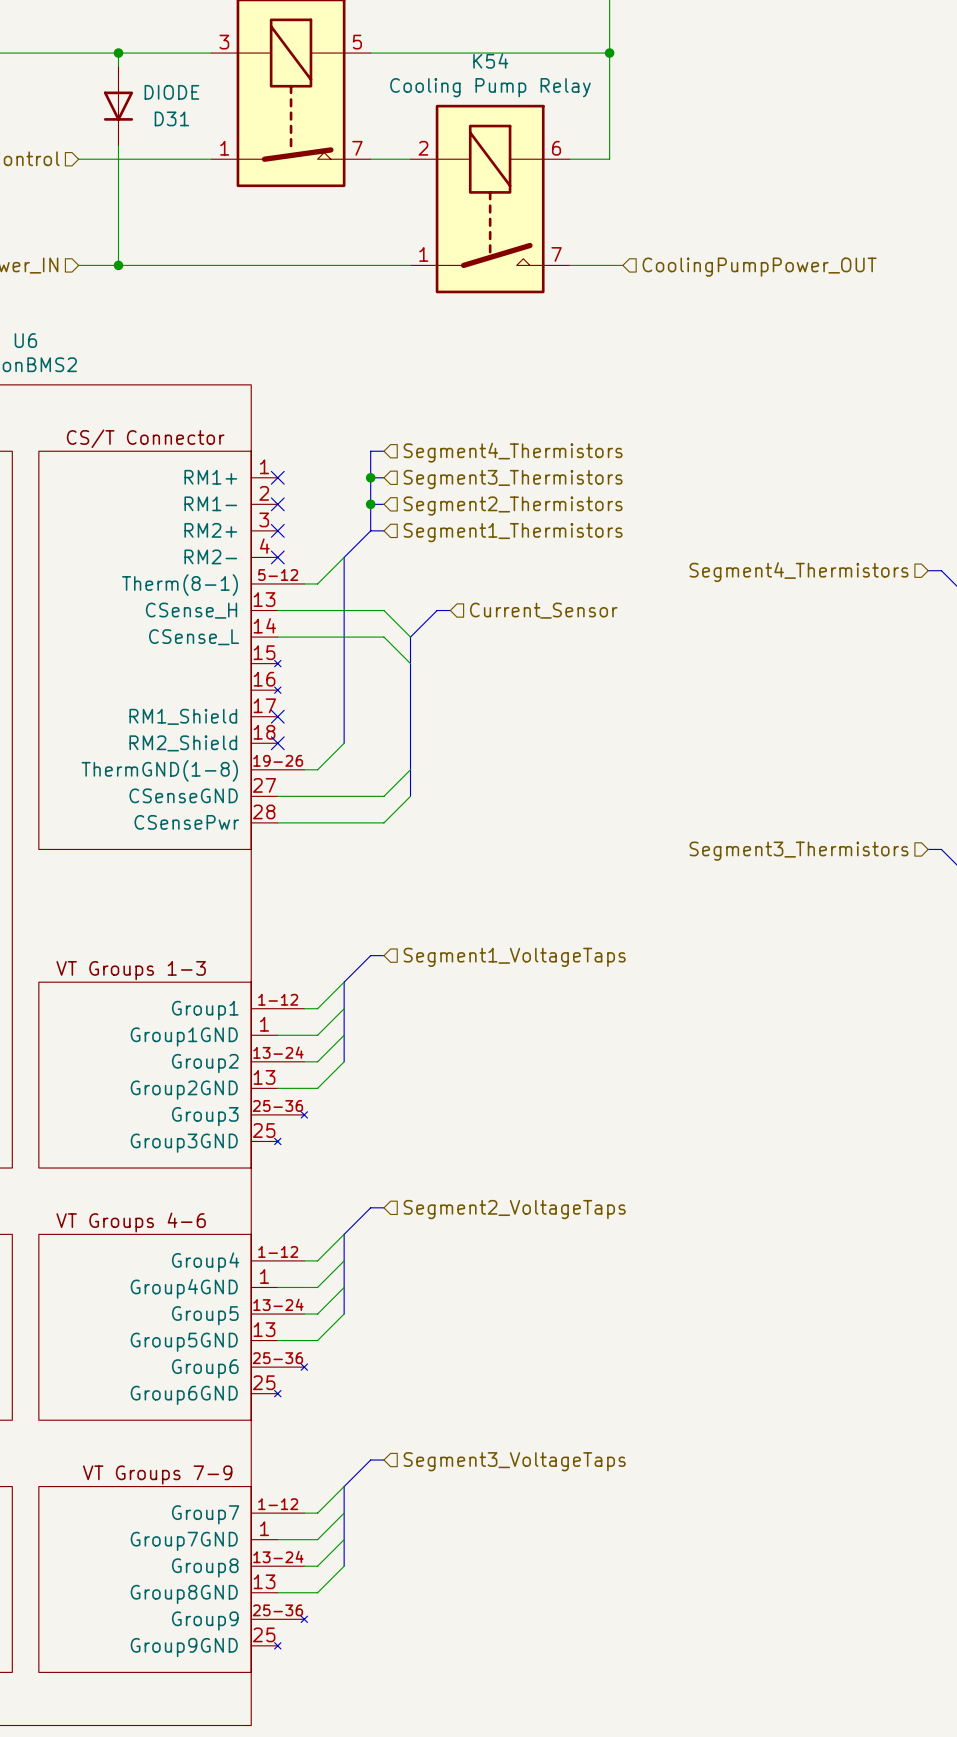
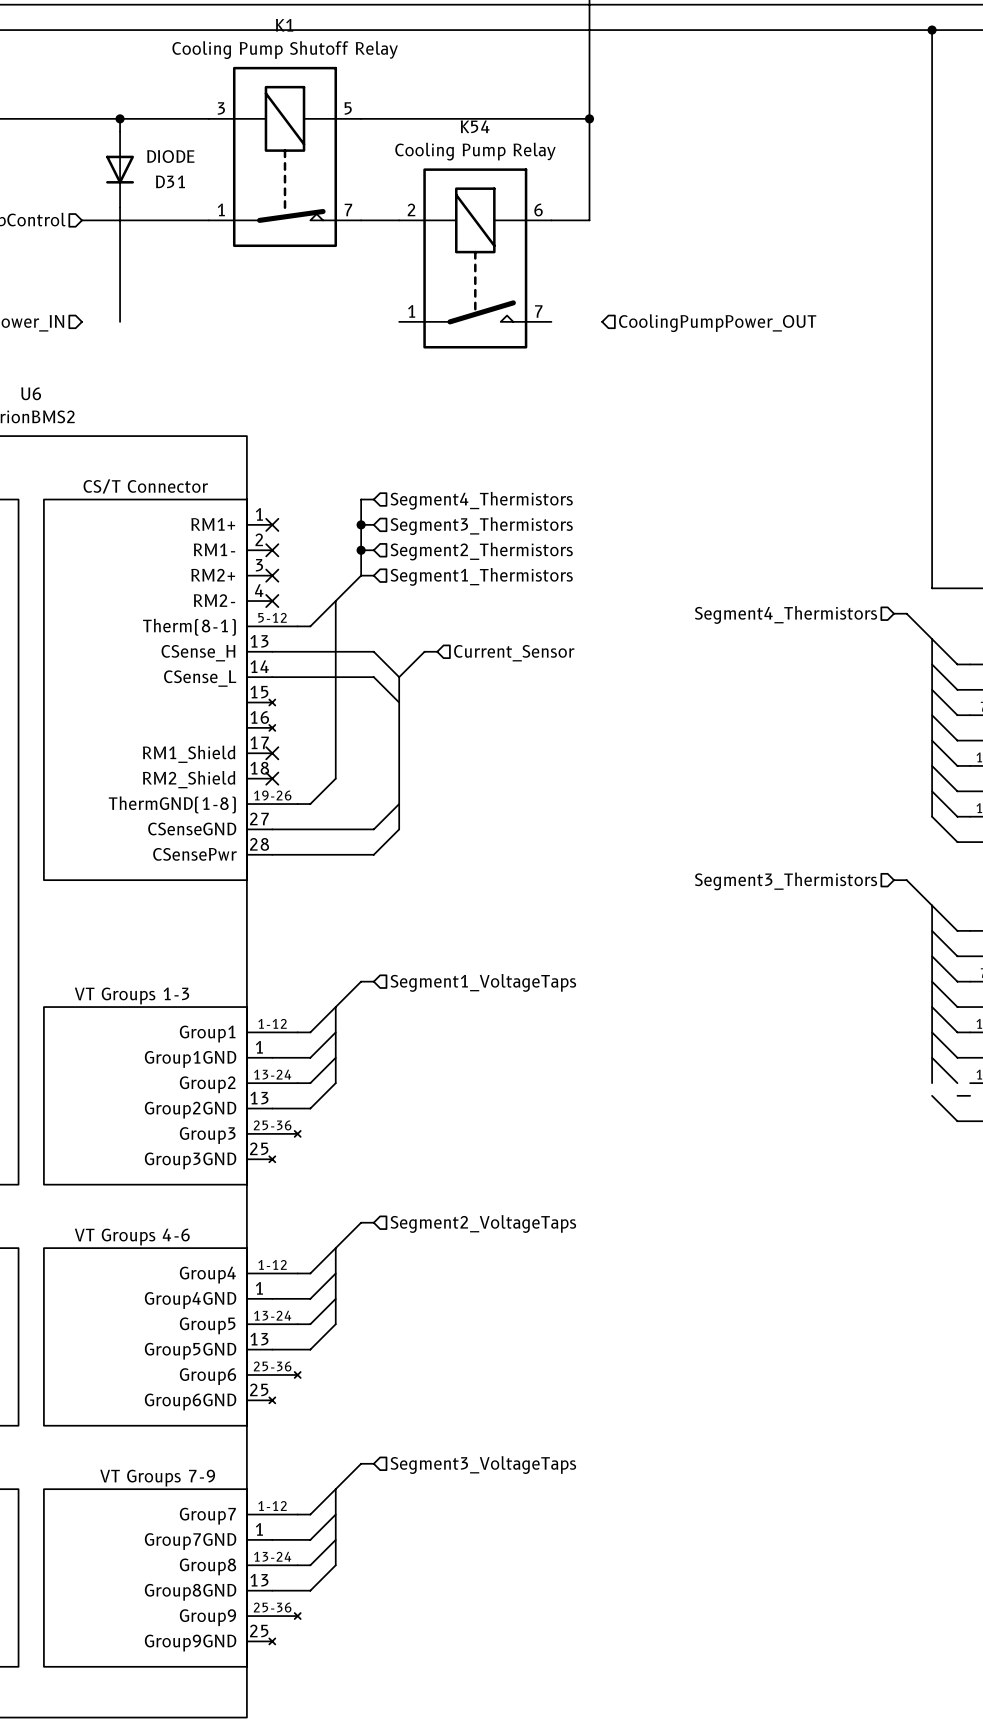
wire: (78, 265) (410, 265) -> none
junction: (118, 265) -> none
wire: (569, 265) (622, 265) -> none

